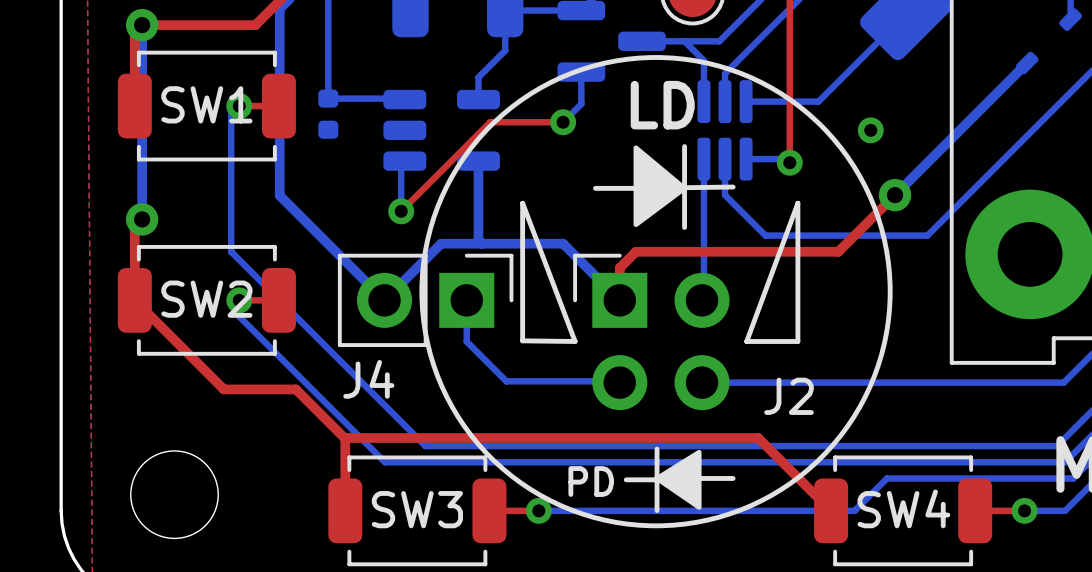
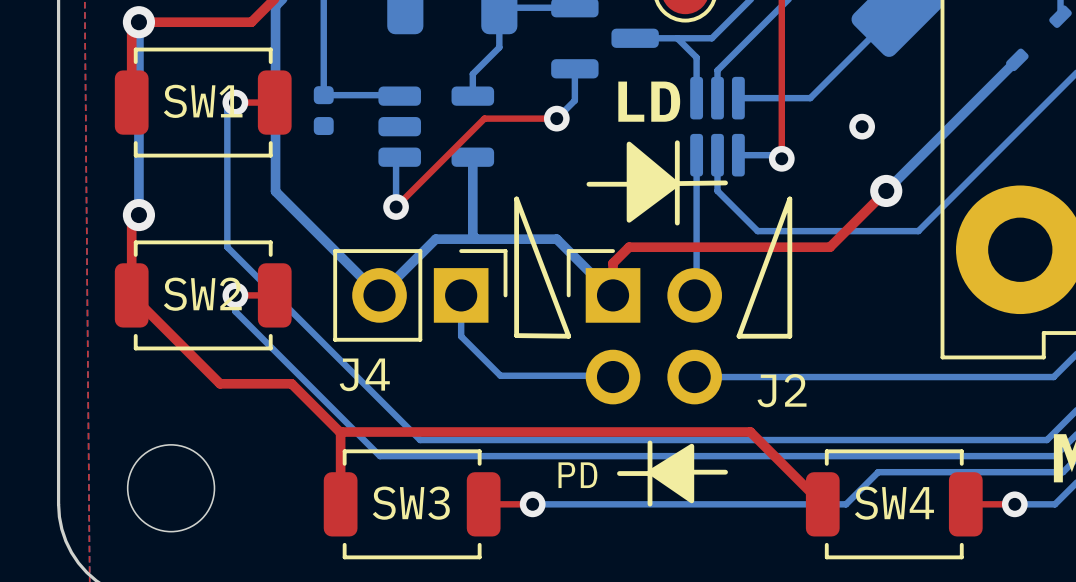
drawing: [419, 55, 893, 529] -> none

